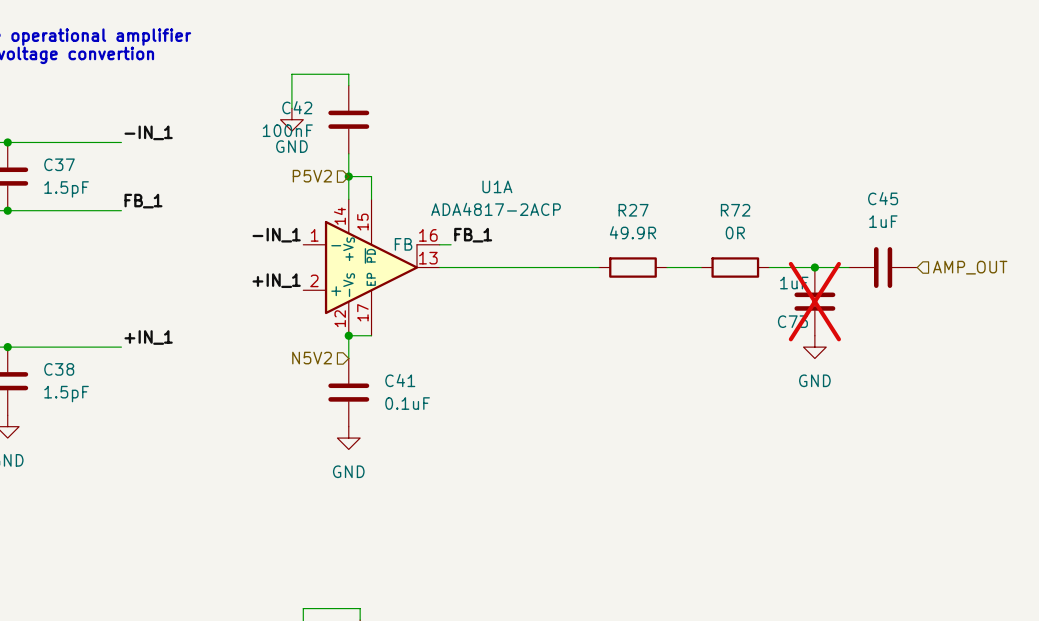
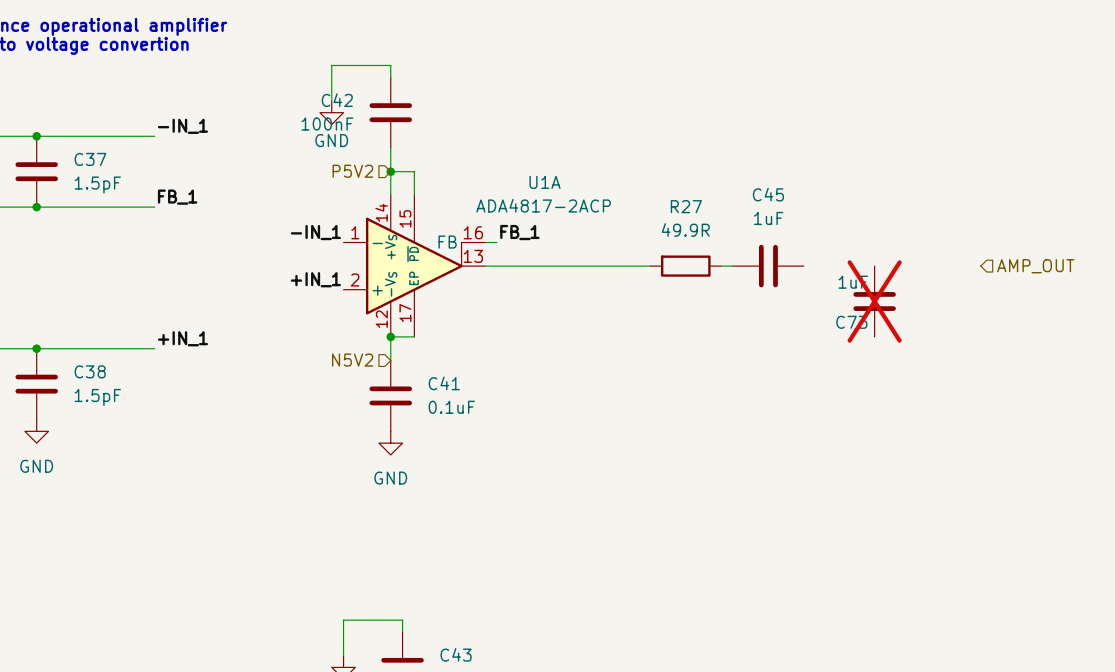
R72: 0R (735, 267) -> none
wire: (769, 267) (849, 267) -> none
junction: (814, 267) -> none
C45 position: (883, 267) -> (768, 266)
power symbol: GND (814, 347) -> none

